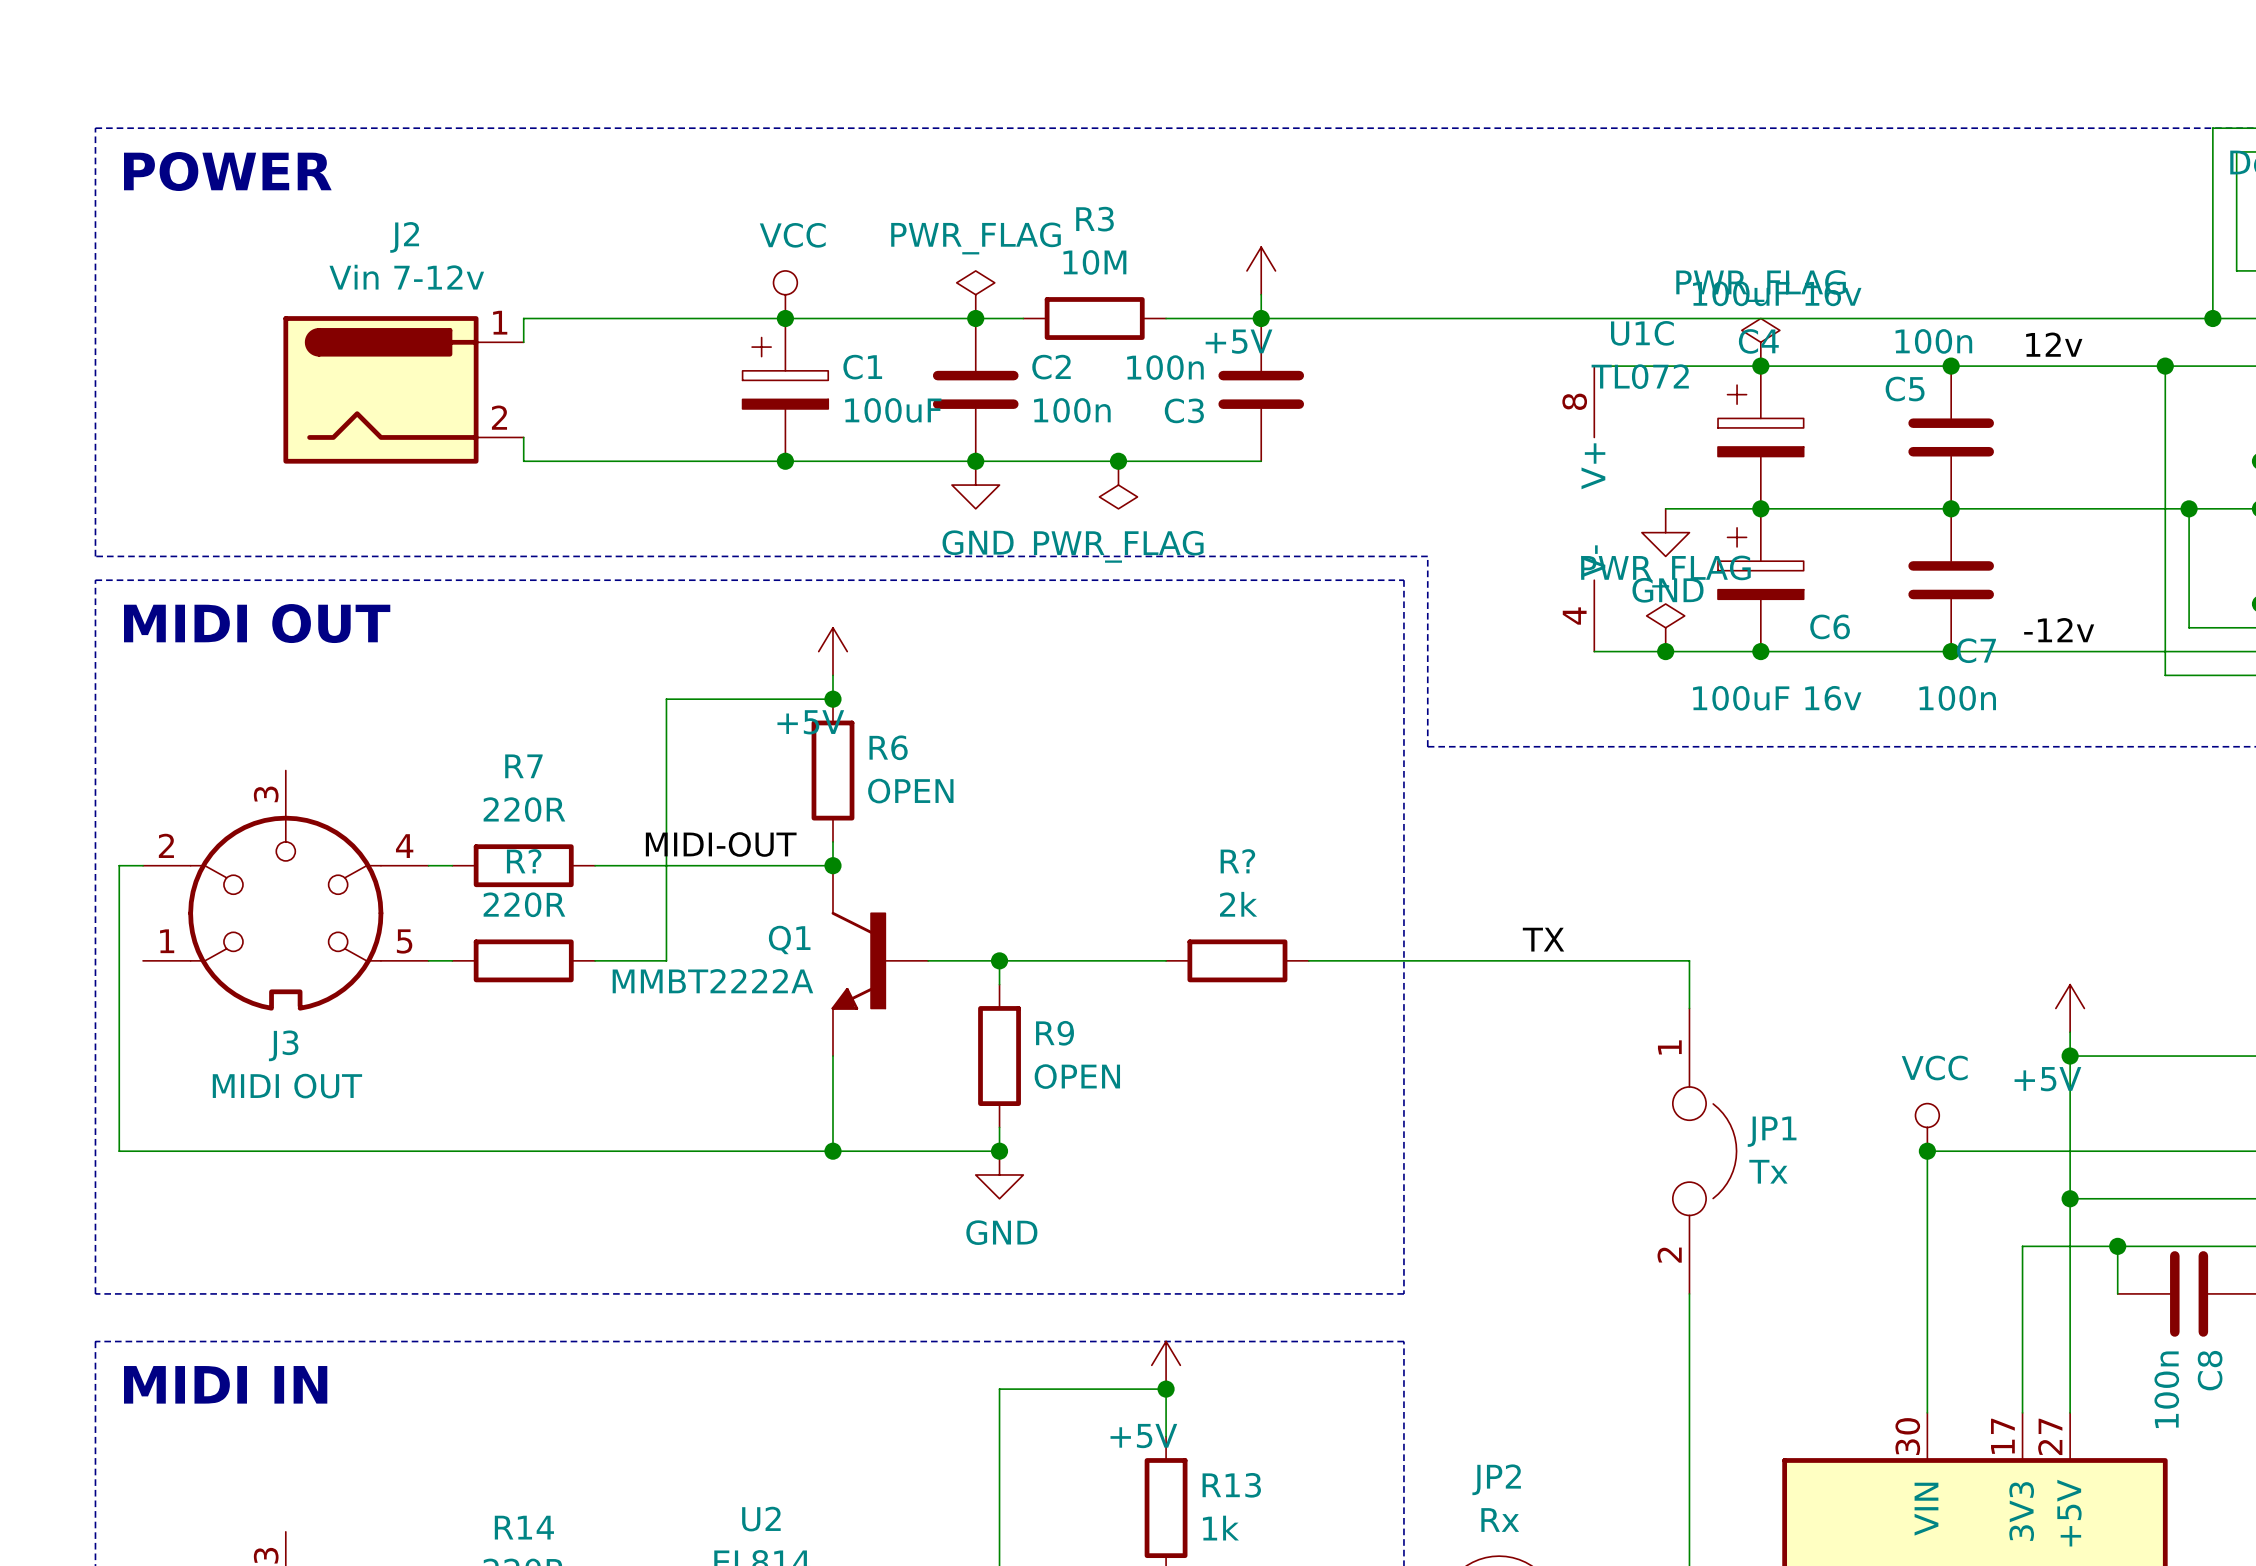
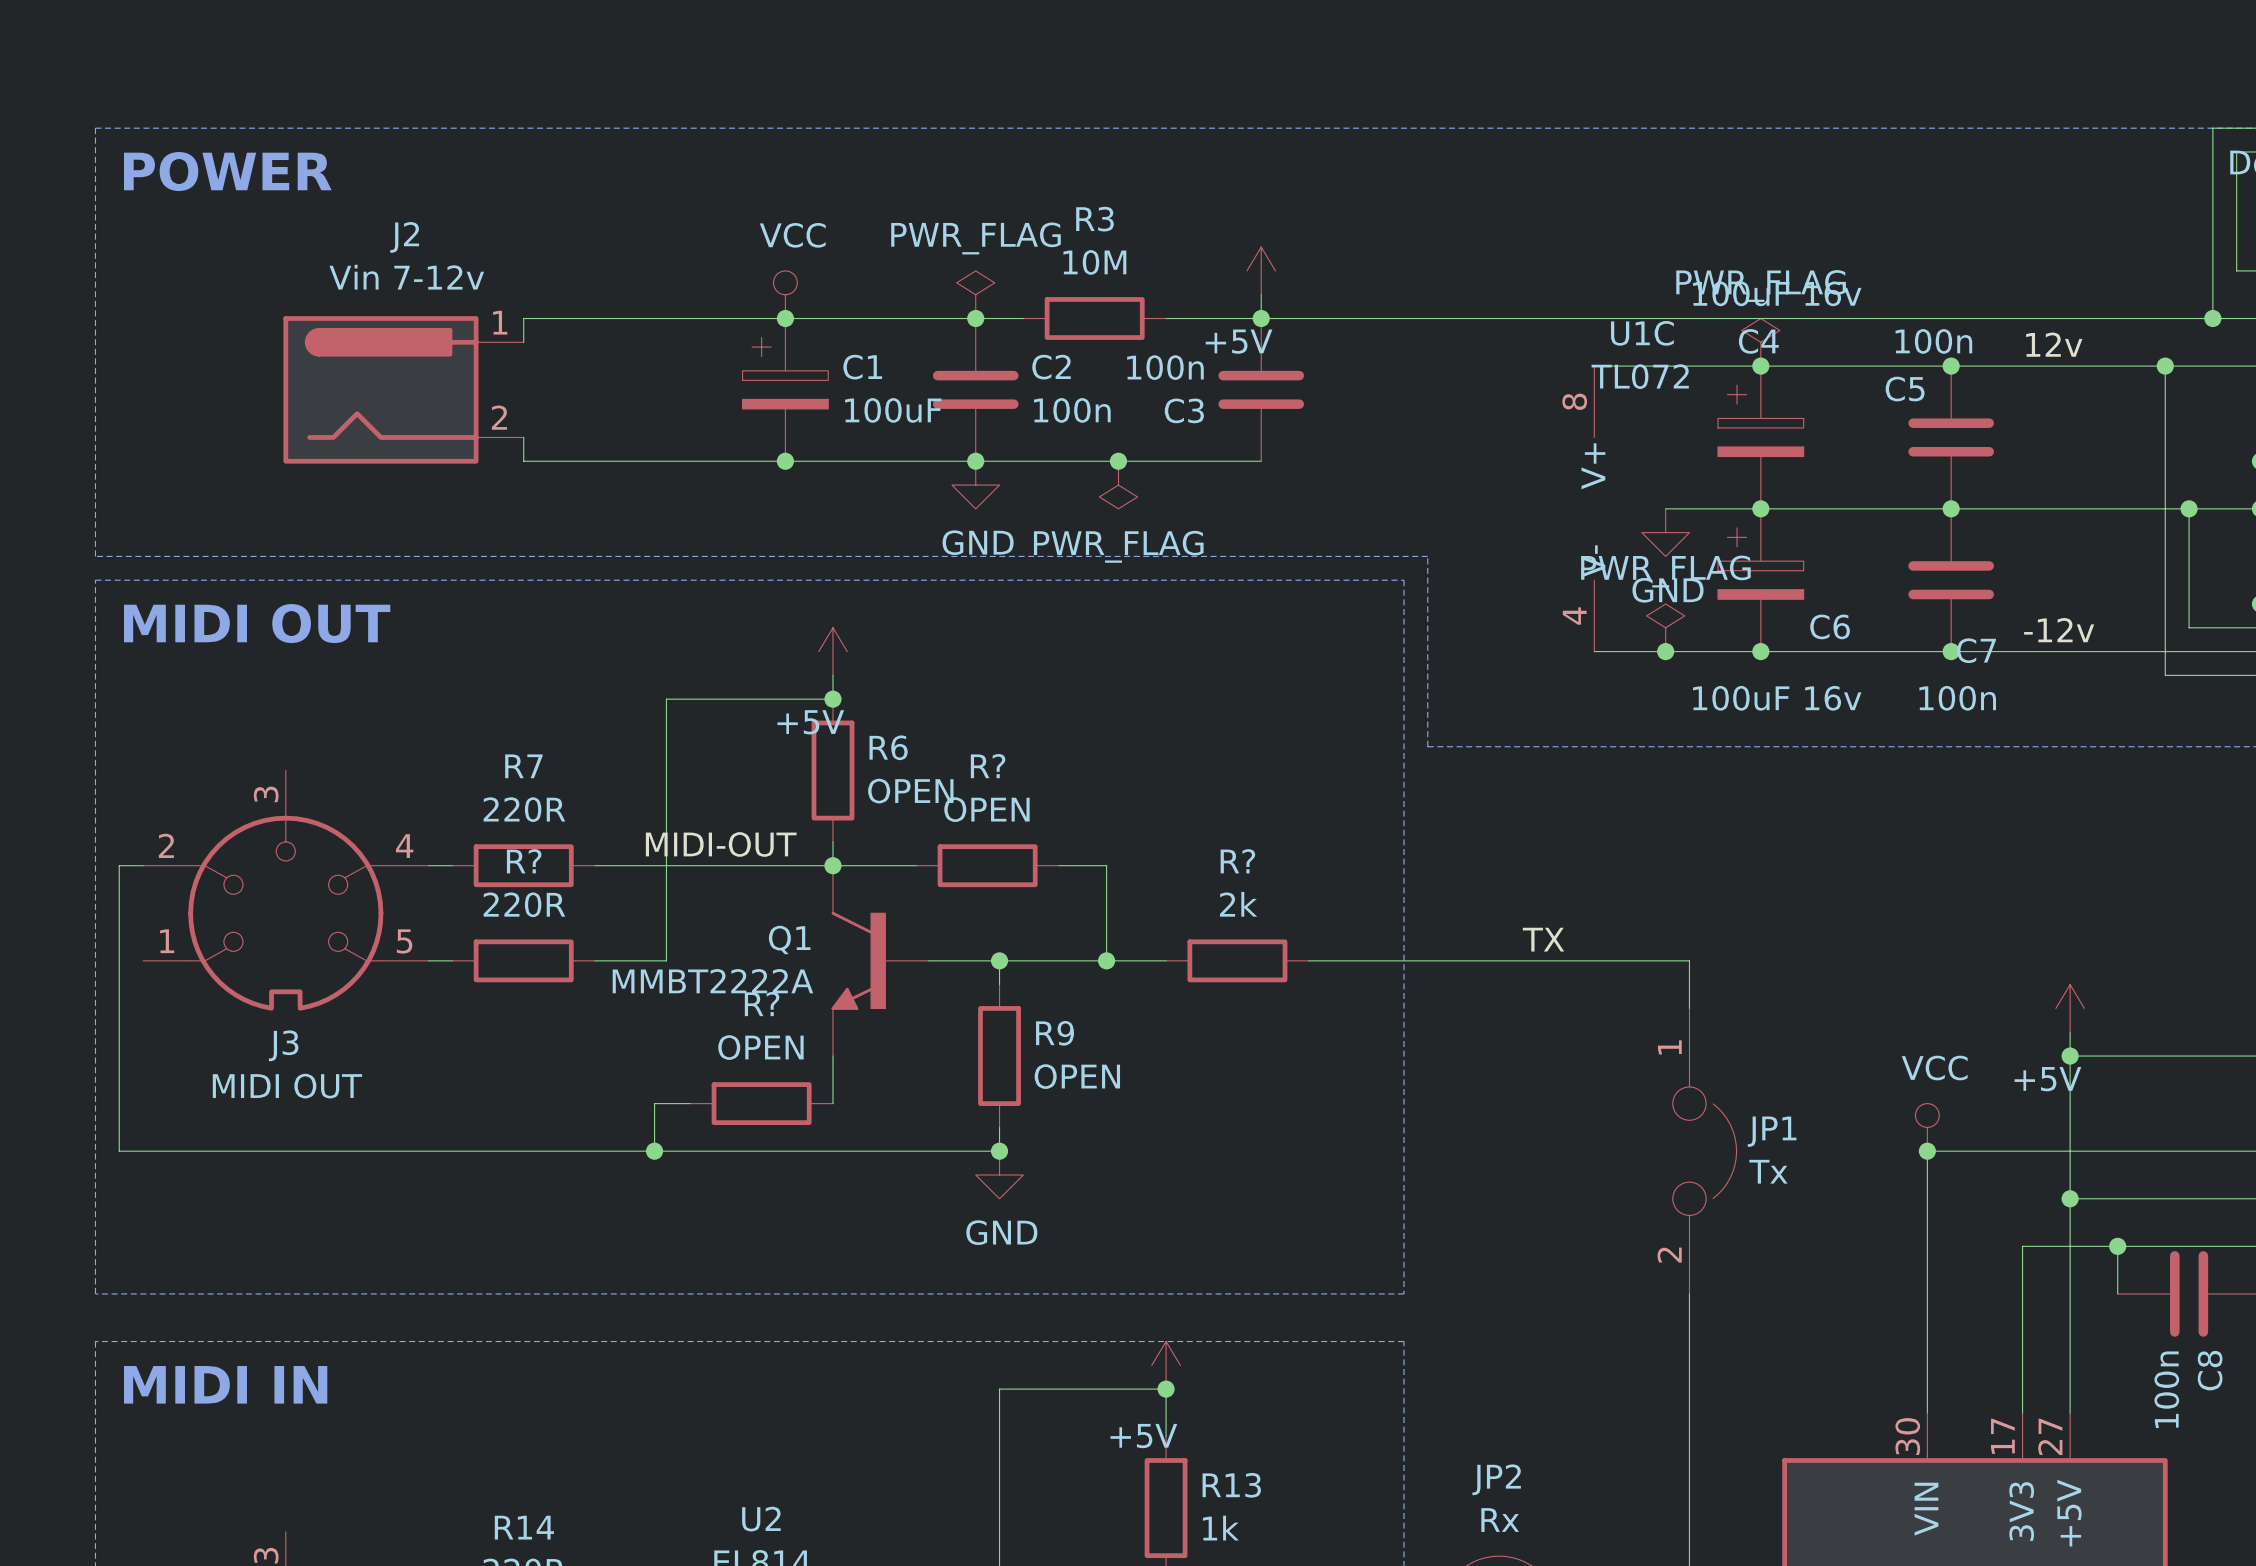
wire: none -> (832, 865) (916, 865)
R?: none -> OPEN (987, 865)
wire: none -> (1059, 865) (1106, 865) (1106, 960)
junction: none -> (1106, 960)
wire: none -> (690, 1103) (654, 1103) (654, 1151)
R?: none -> OPEN (761, 1103)
wire: (832, 1103) (832, 1151) -> none
junction: none -> (654, 1151)
junction: (832, 1151) -> none

